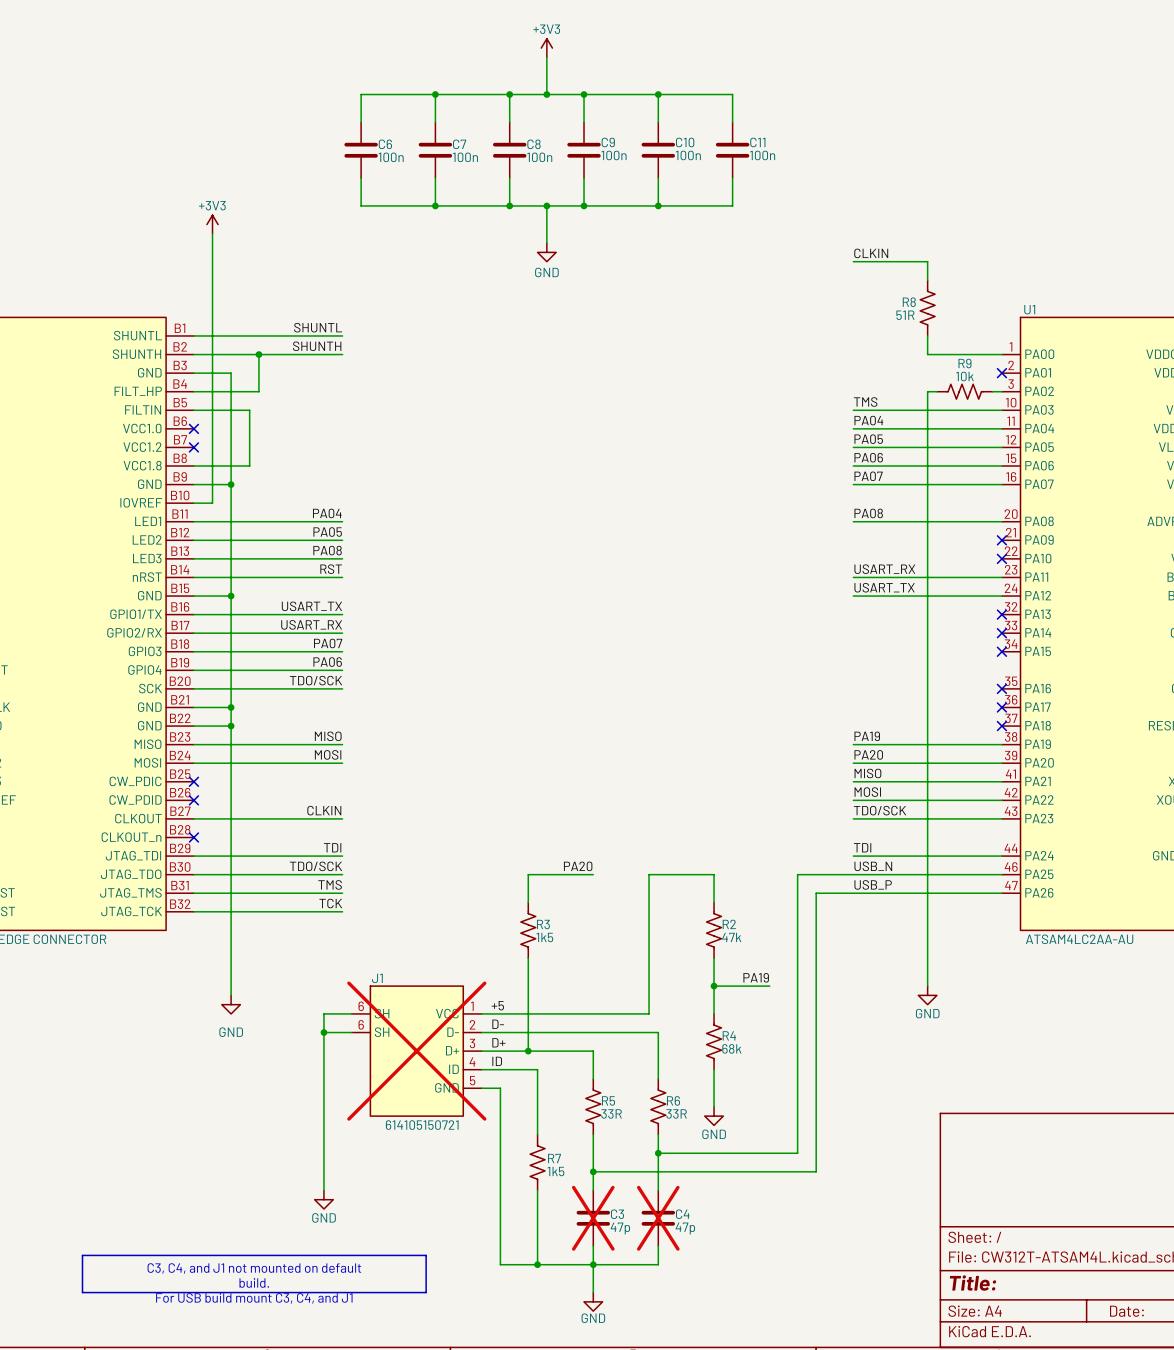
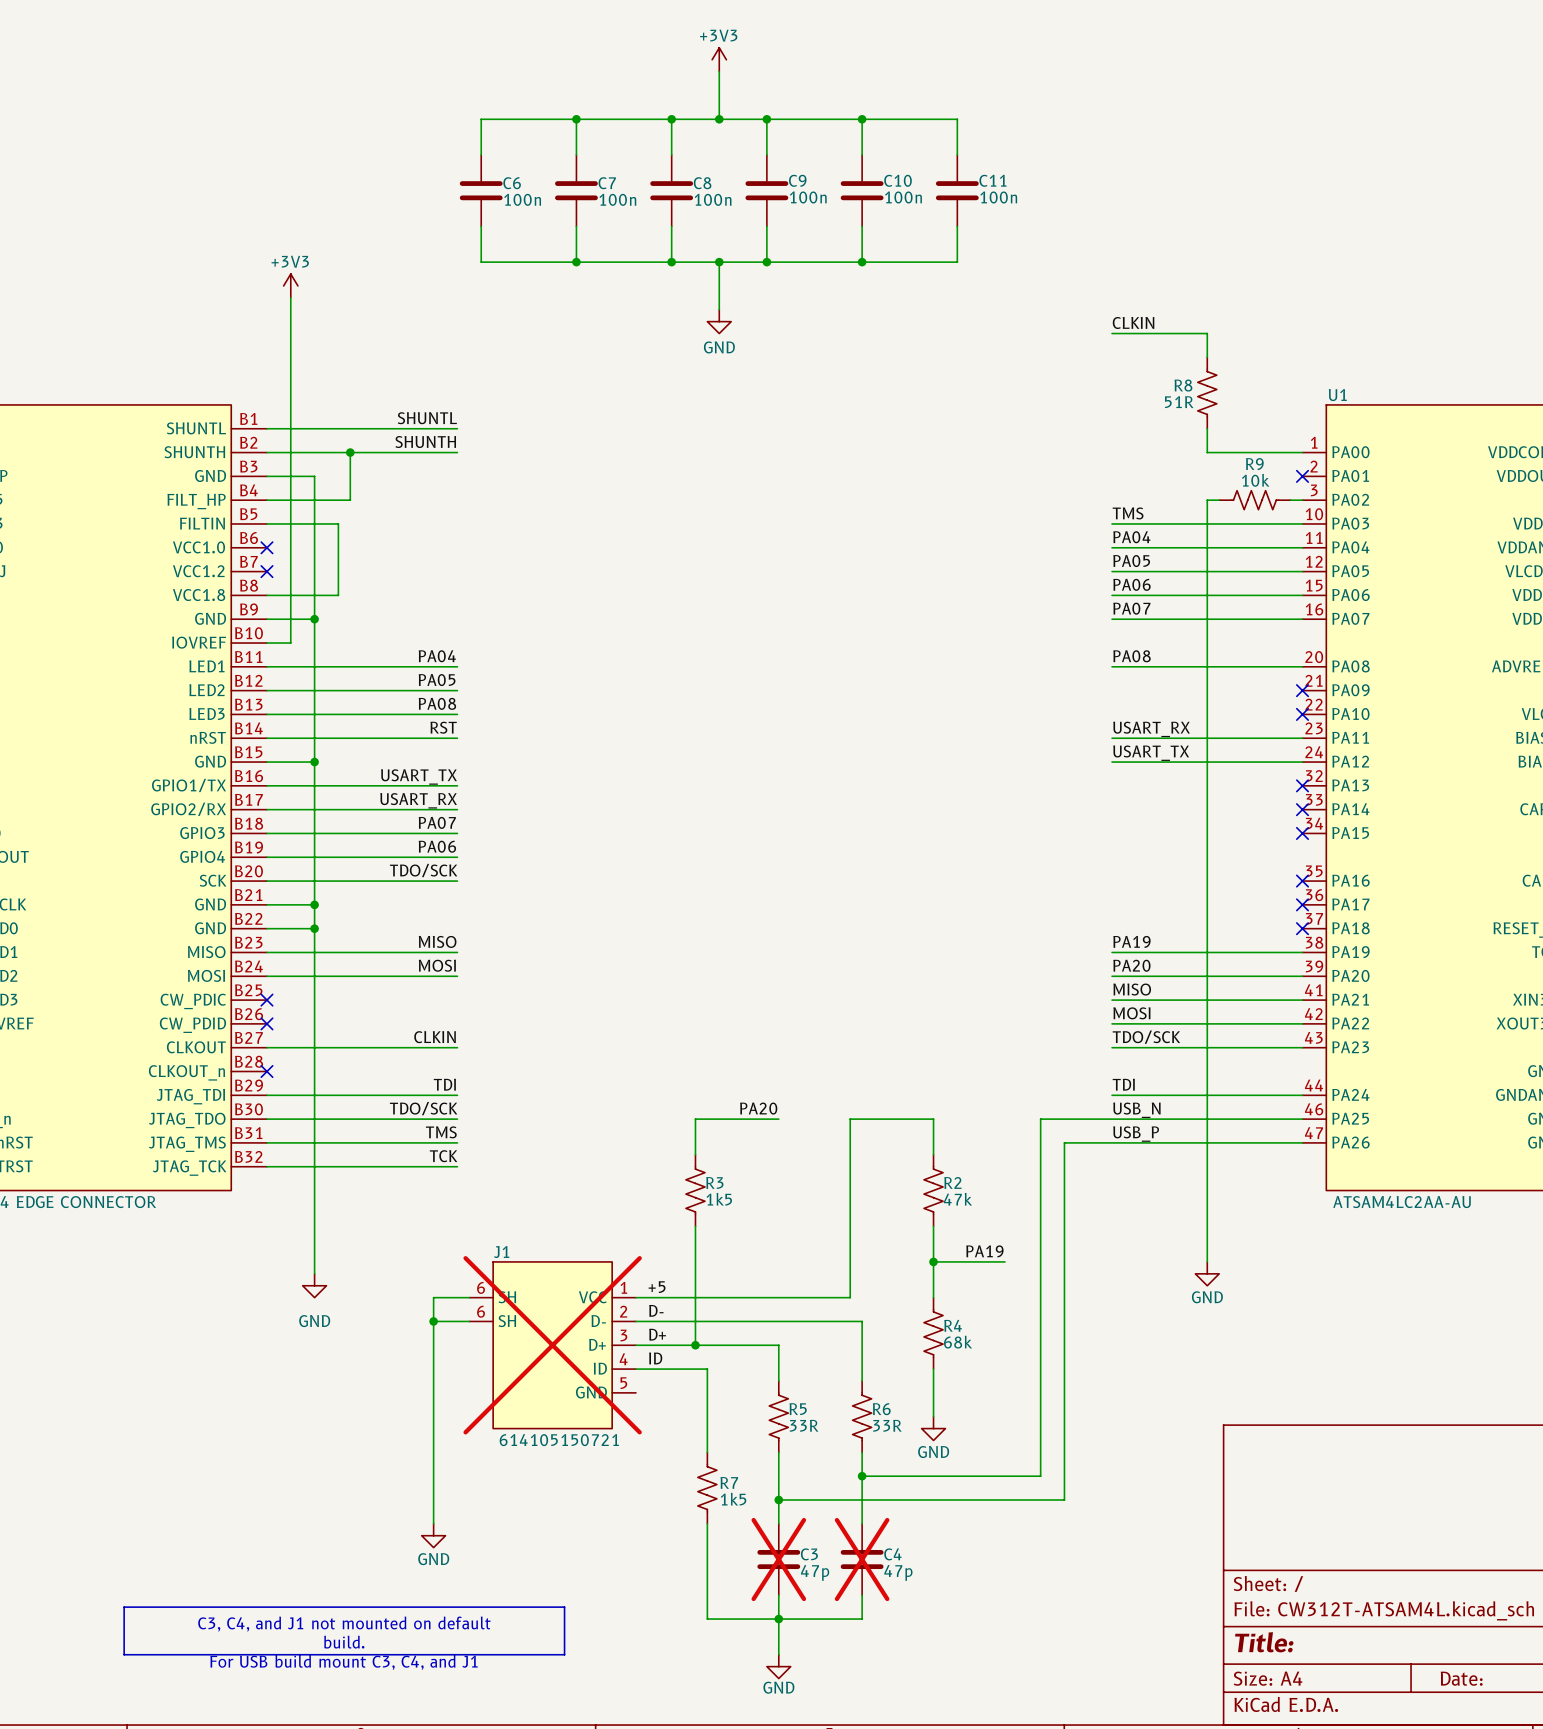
wire: (481, 1088) (500, 1088) (500, 1264) (537, 1264) -> none
junction: (537, 1264) -> none

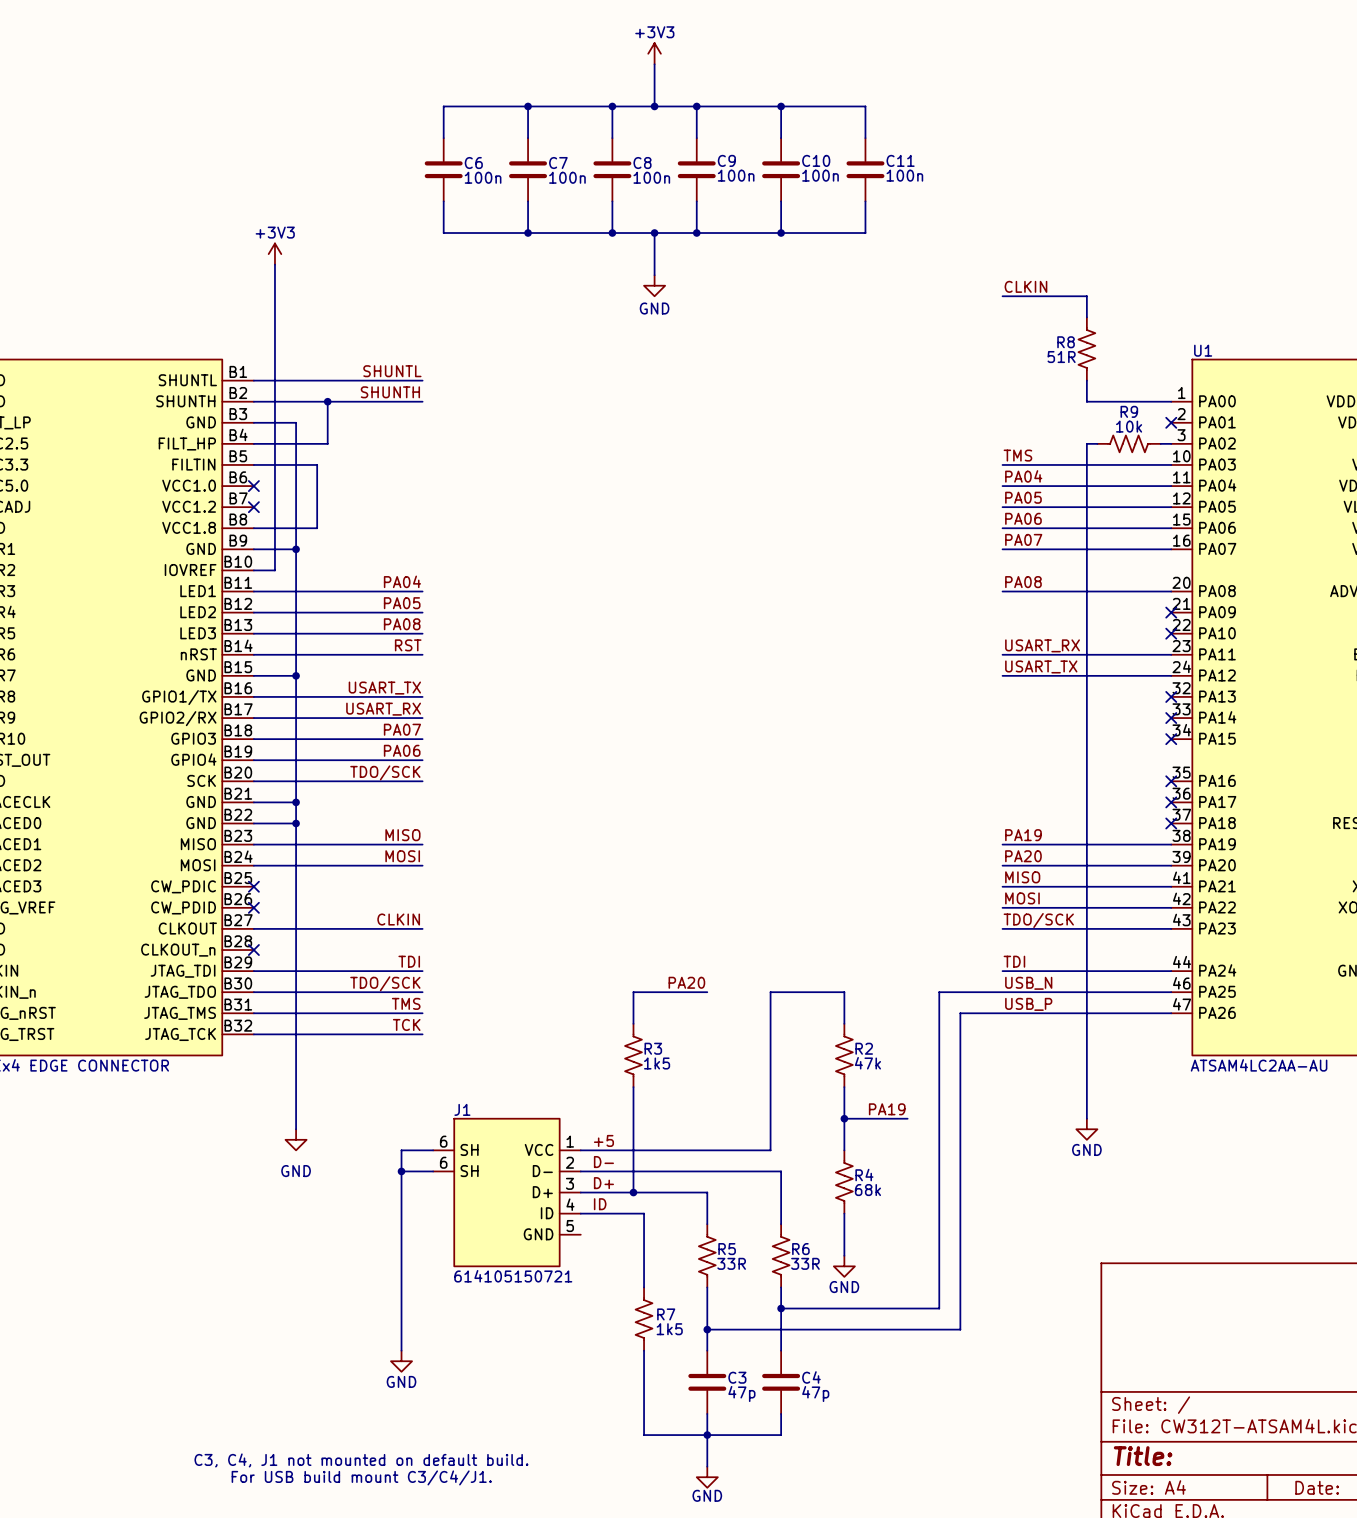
J1 do-not-place cross: (552, 1345) -> none
C3 do-not-place cross: (778, 1559) -> none
C4 do-not-place cross: (862, 1559) -> none
line: (124, 1607) (564, 1607) (564, 1654) (124, 1654) (124, 1607) -> none
text: C3, C4, and J1 not mounted on default (344, 1624) -> C3, C4, J1 not mounted on default build. (361, 1460)
text: build. (344, 1642) -> none
text: For USB build mount C3, C4, and J1 (343, 1662) -> For USB build mount C3/C4/J1. (361, 1477)

